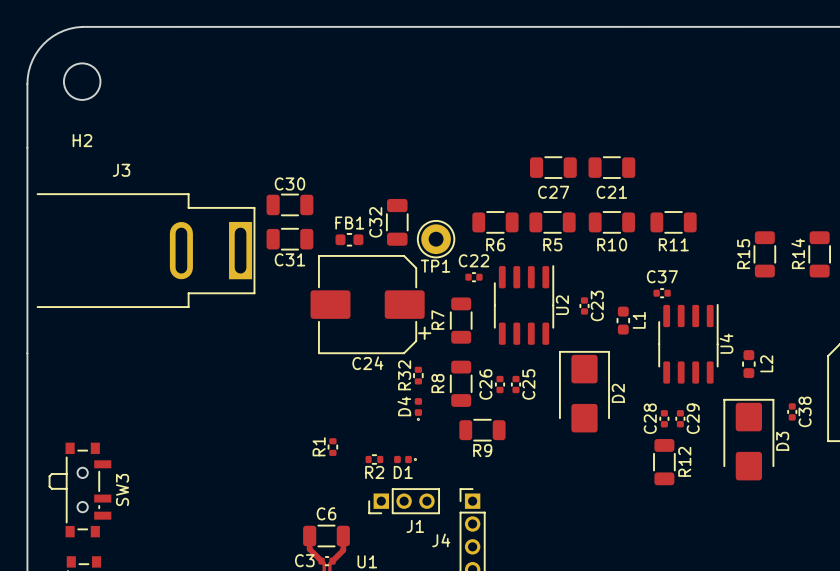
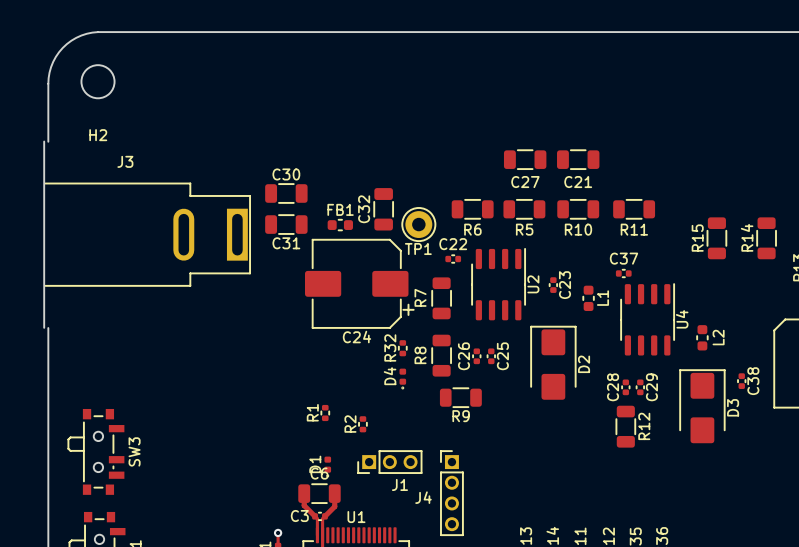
J3 footprint: [26, 147, 256, 355] -> [43, 140, 251, 329]
R2 rotation: 0° (374, 459) -> 90° clockwise (362, 424)
D1 rotation: 0° (405, 459) -> 90° clockwise (327, 466)
D1 position: (405, 459) -> (327, 466)

